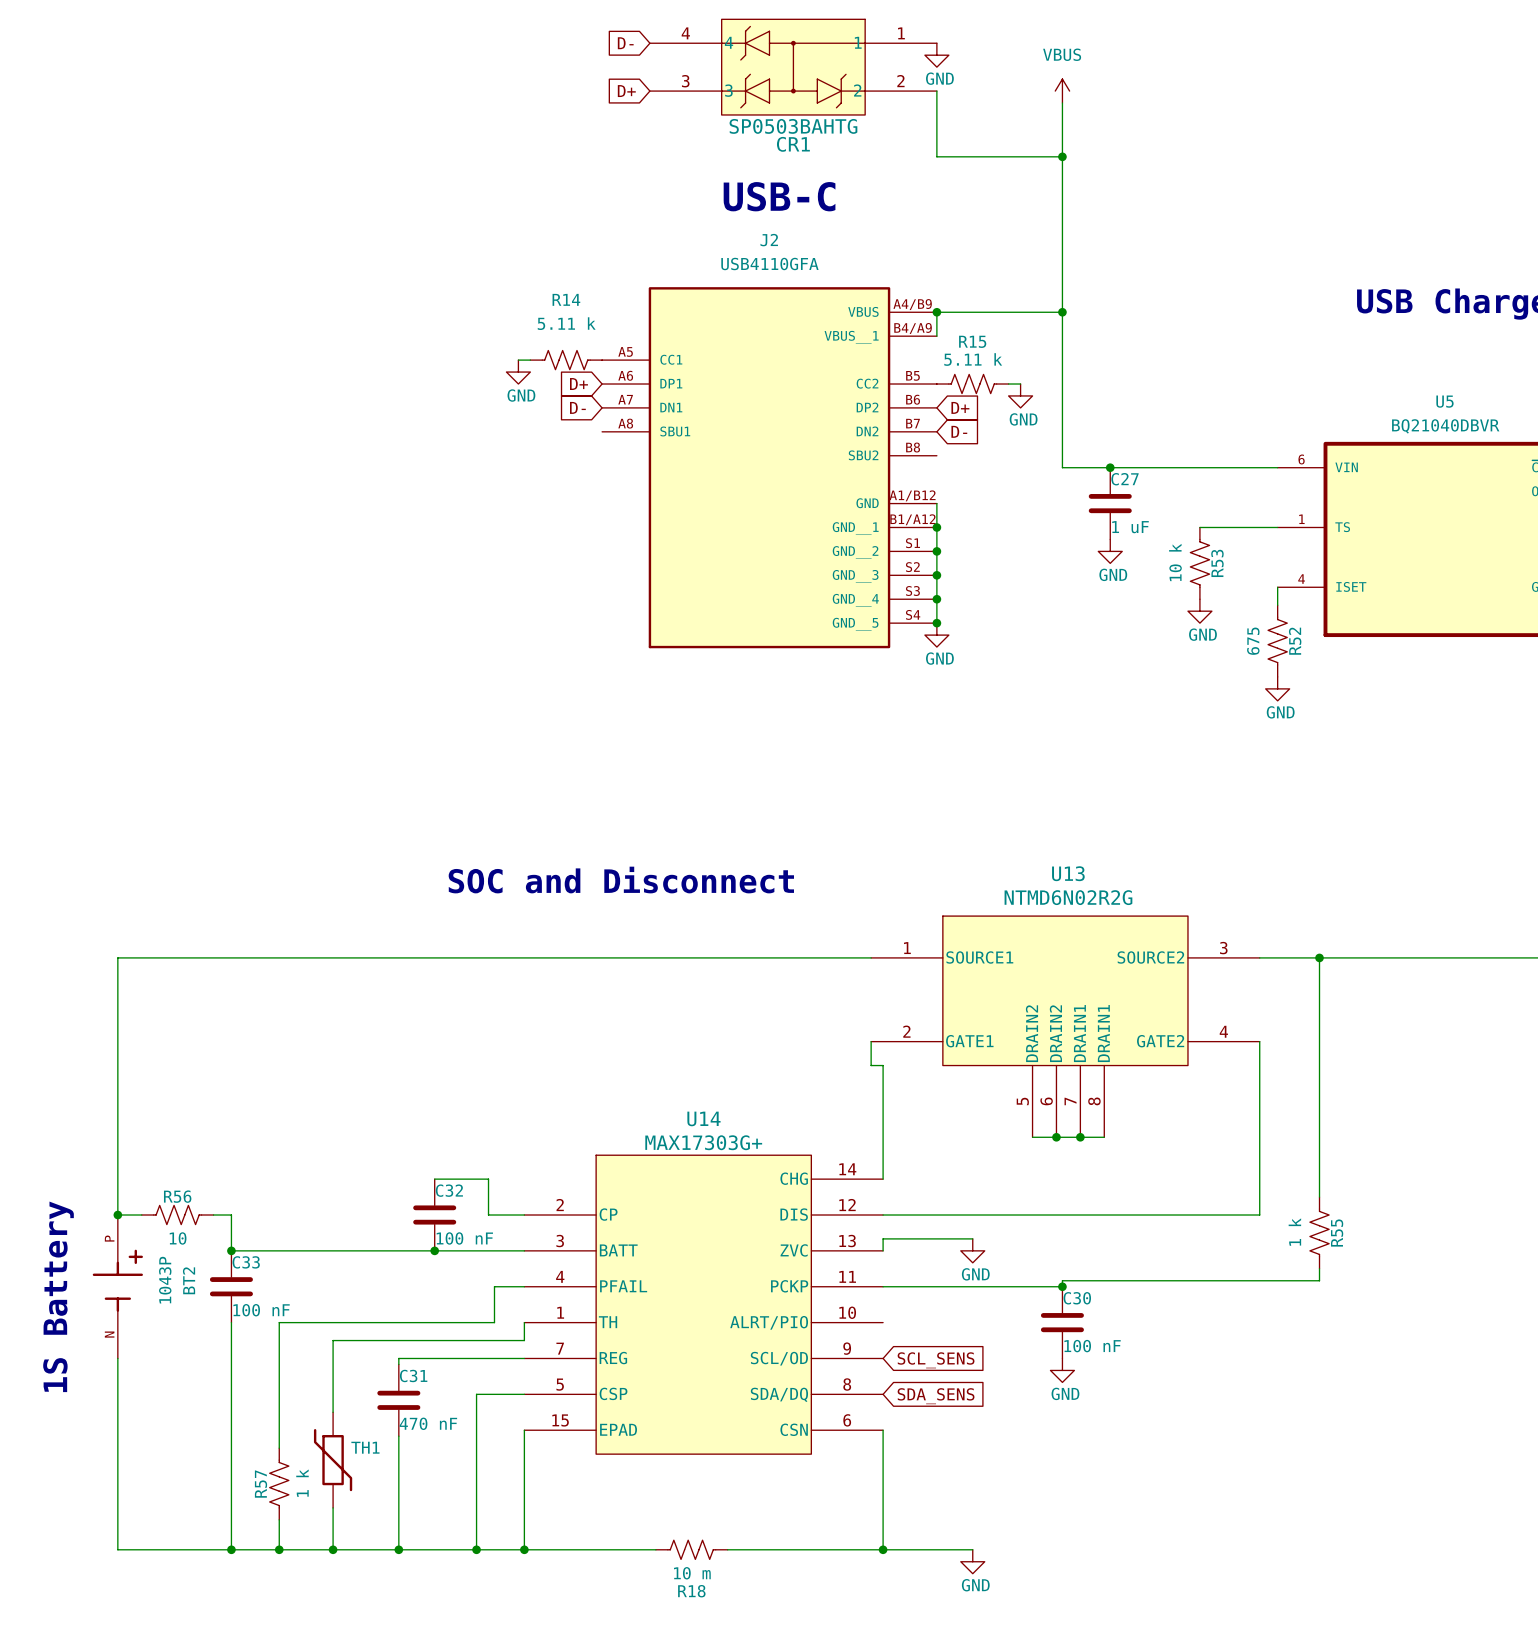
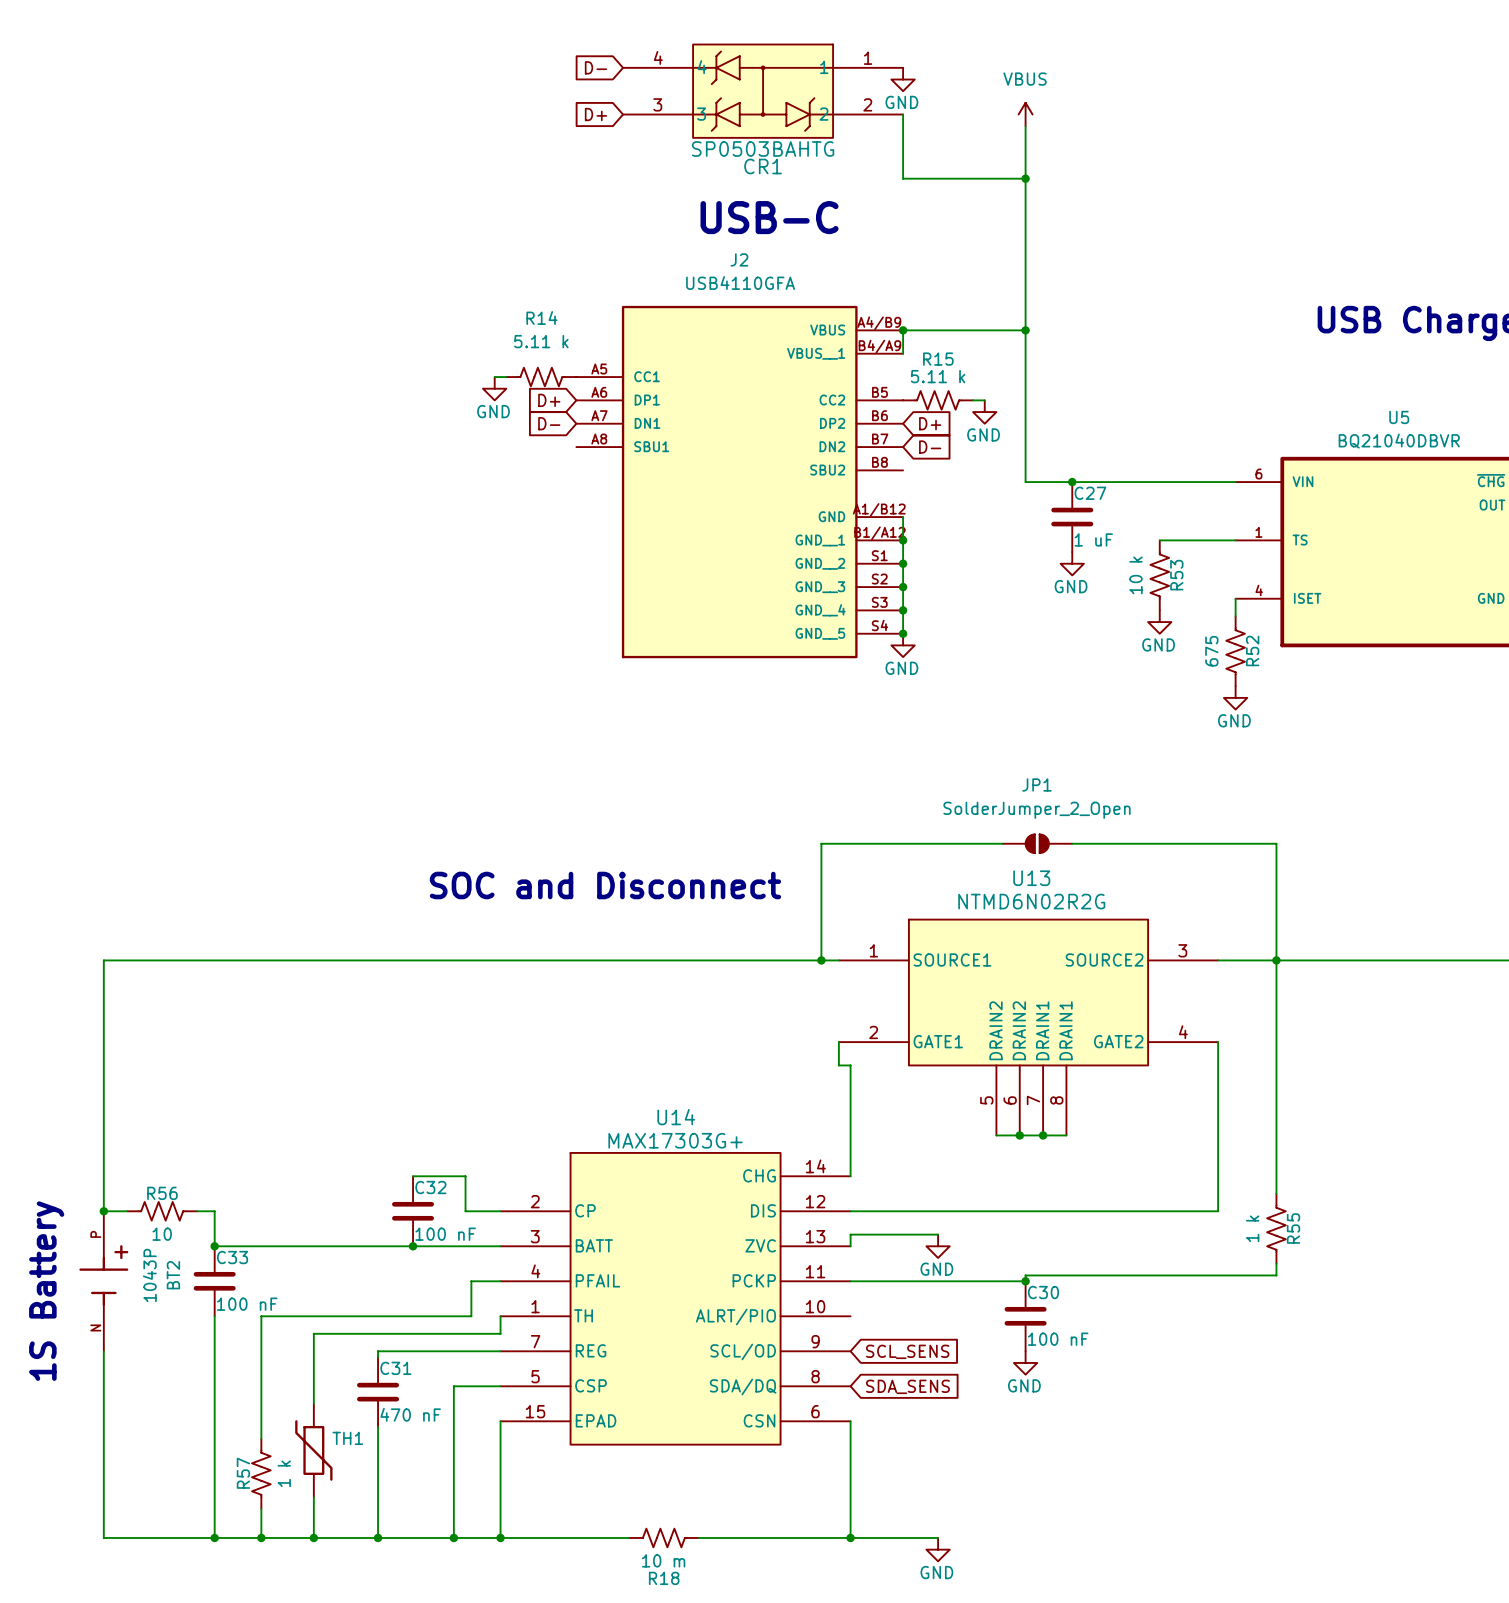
wire: none -> (1002, 843) (821, 843) (821, 960)
JP1: none -> SolderJumper_2_Open (1037, 843)
wire: none -> (1072, 843) (1276, 843) (1276, 960)
junction: none -> (821, 960)

